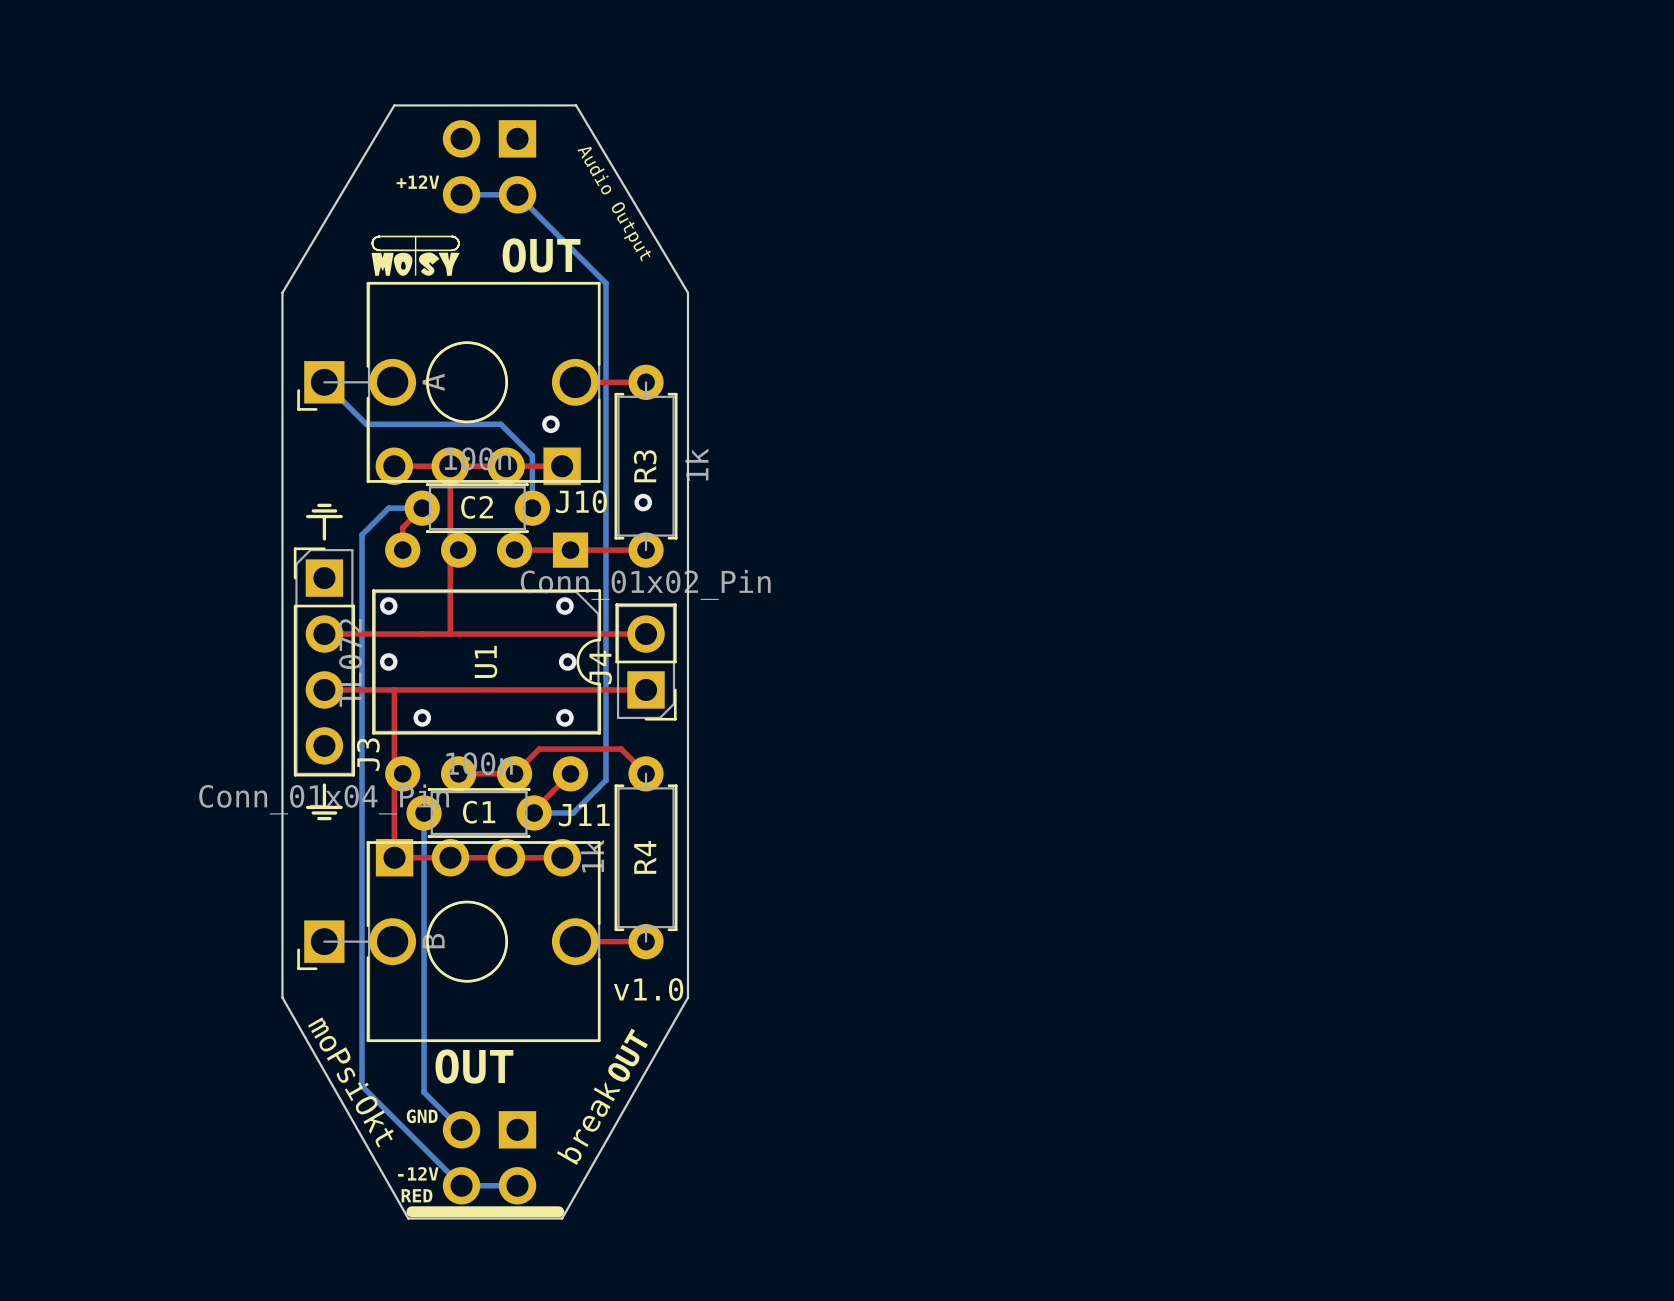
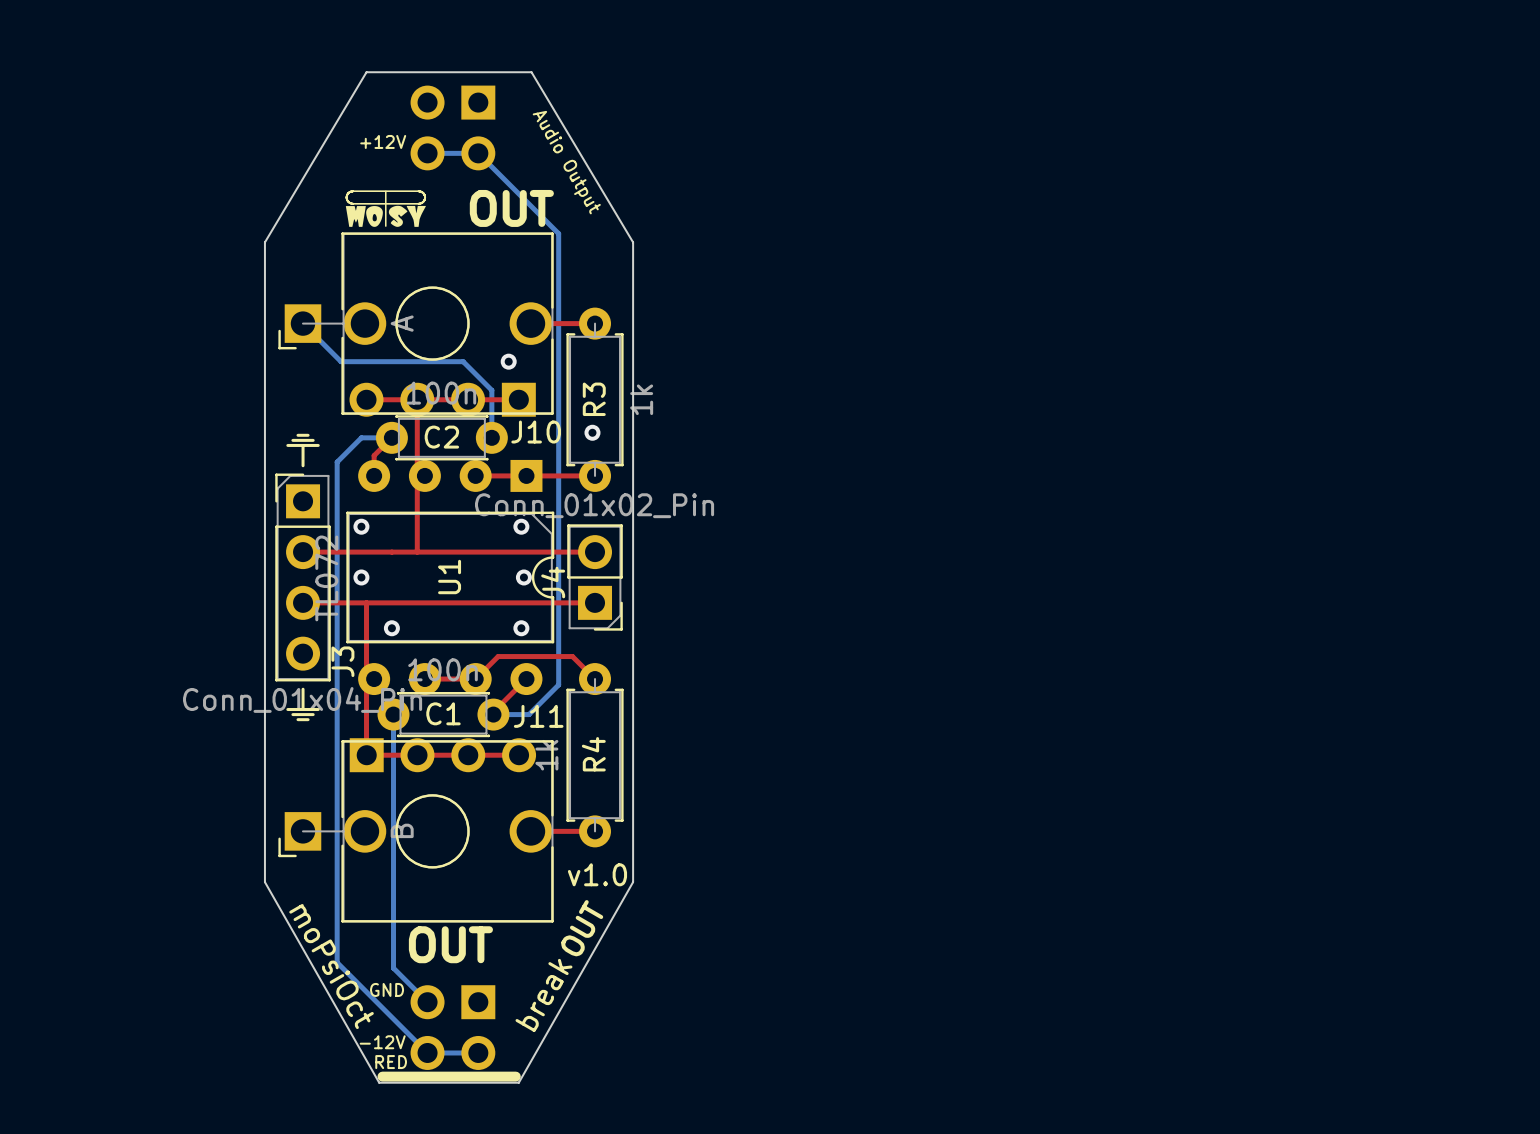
text: moPsiOkt (350, 1082) -> moPsiOct (331, 966)

